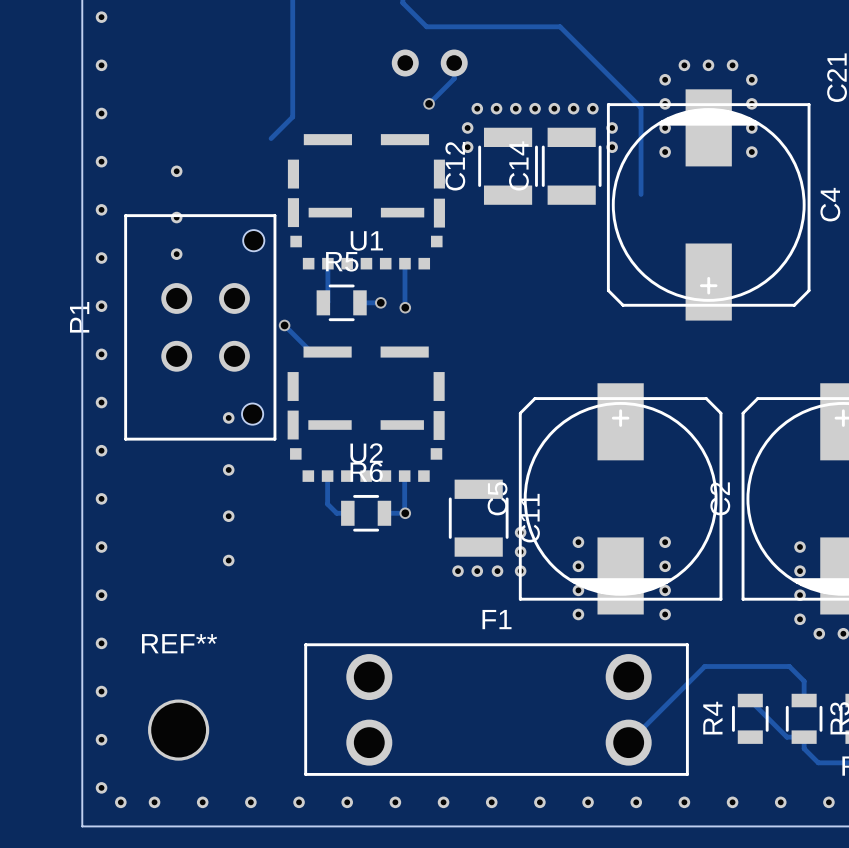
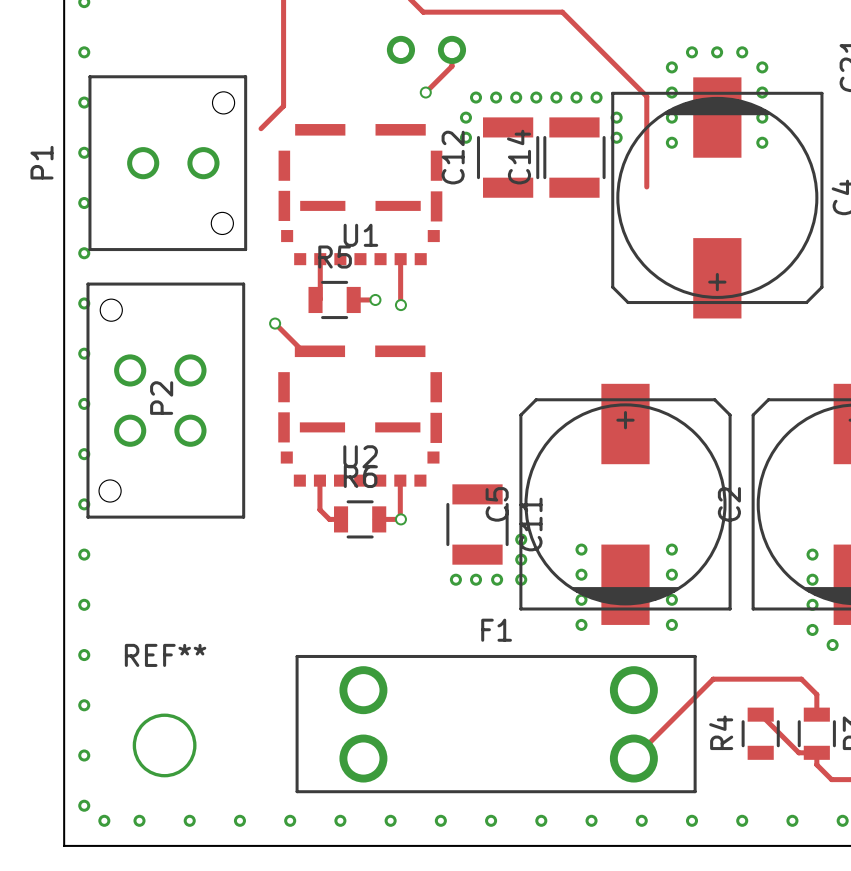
part: (176, 171) -> none
P1 footprint: [124, 214, 277, 441] -> [88, 75, 248, 252]
part: (176, 217) -> none
part: (176, 254) -> none
P2: none -> (165, 400)
part: (228, 417) -> none
part: (228, 469) -> none
part: (228, 516) -> none
part: (228, 560) -> none

